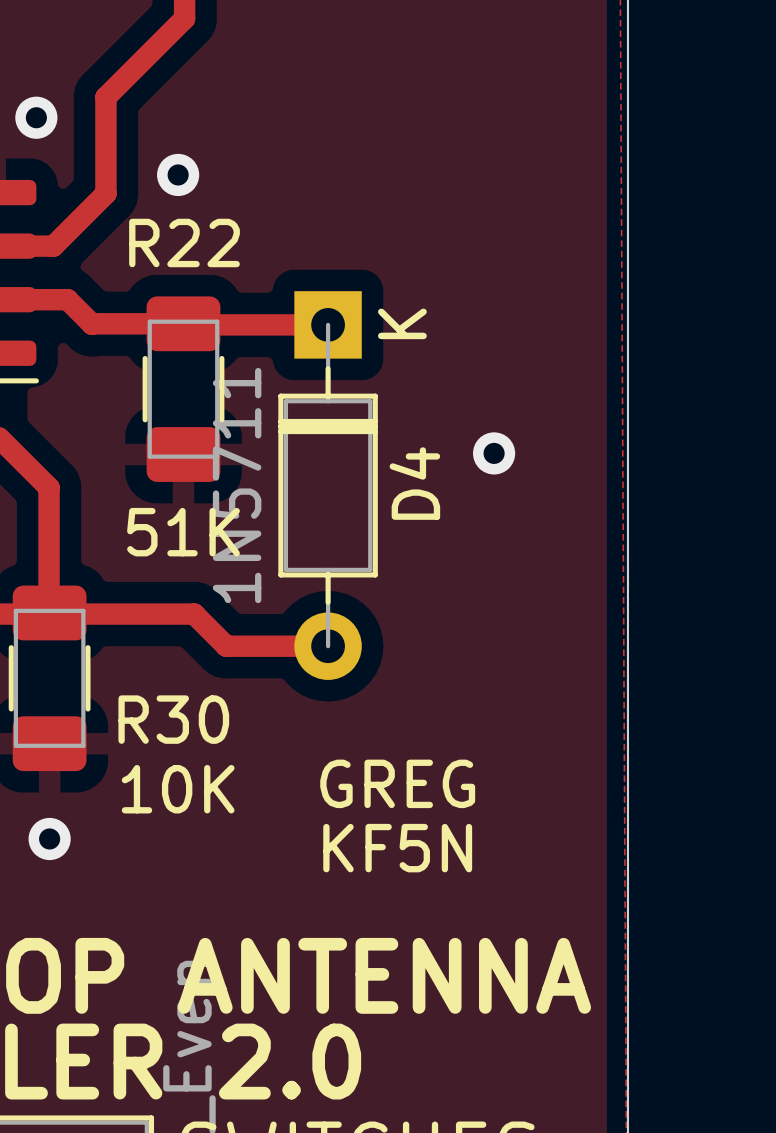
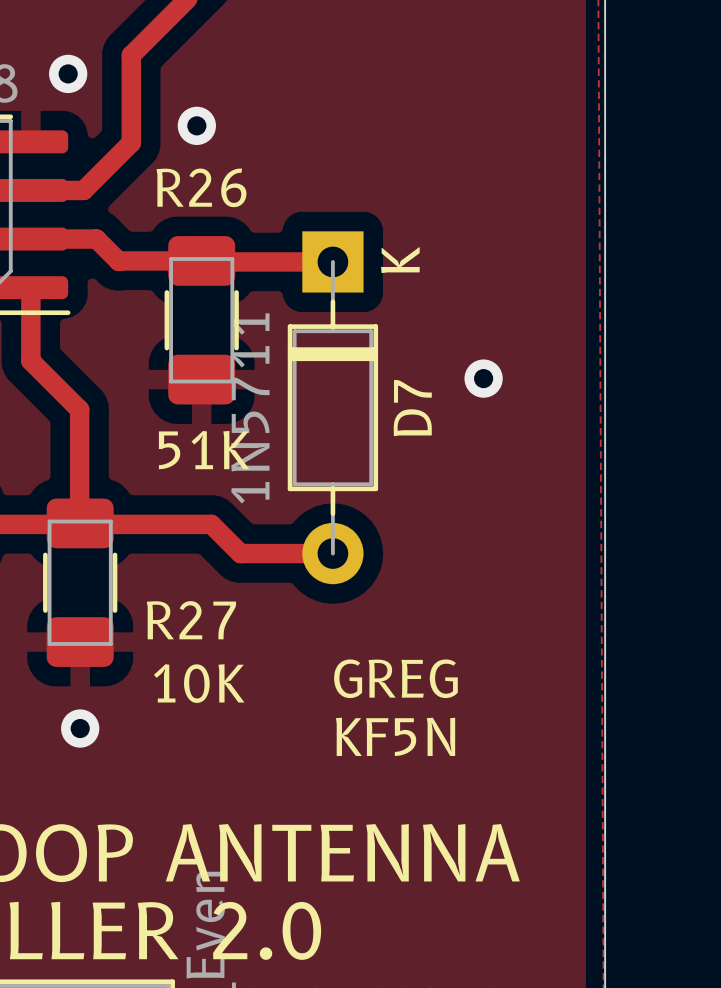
R22 name: R22 (184, 242) -> R26 (201, 187)
D4 name: D4 (414, 483) -> D7 (412, 408)
R30 name: R30 (173, 719) -> R27 (191, 620)

